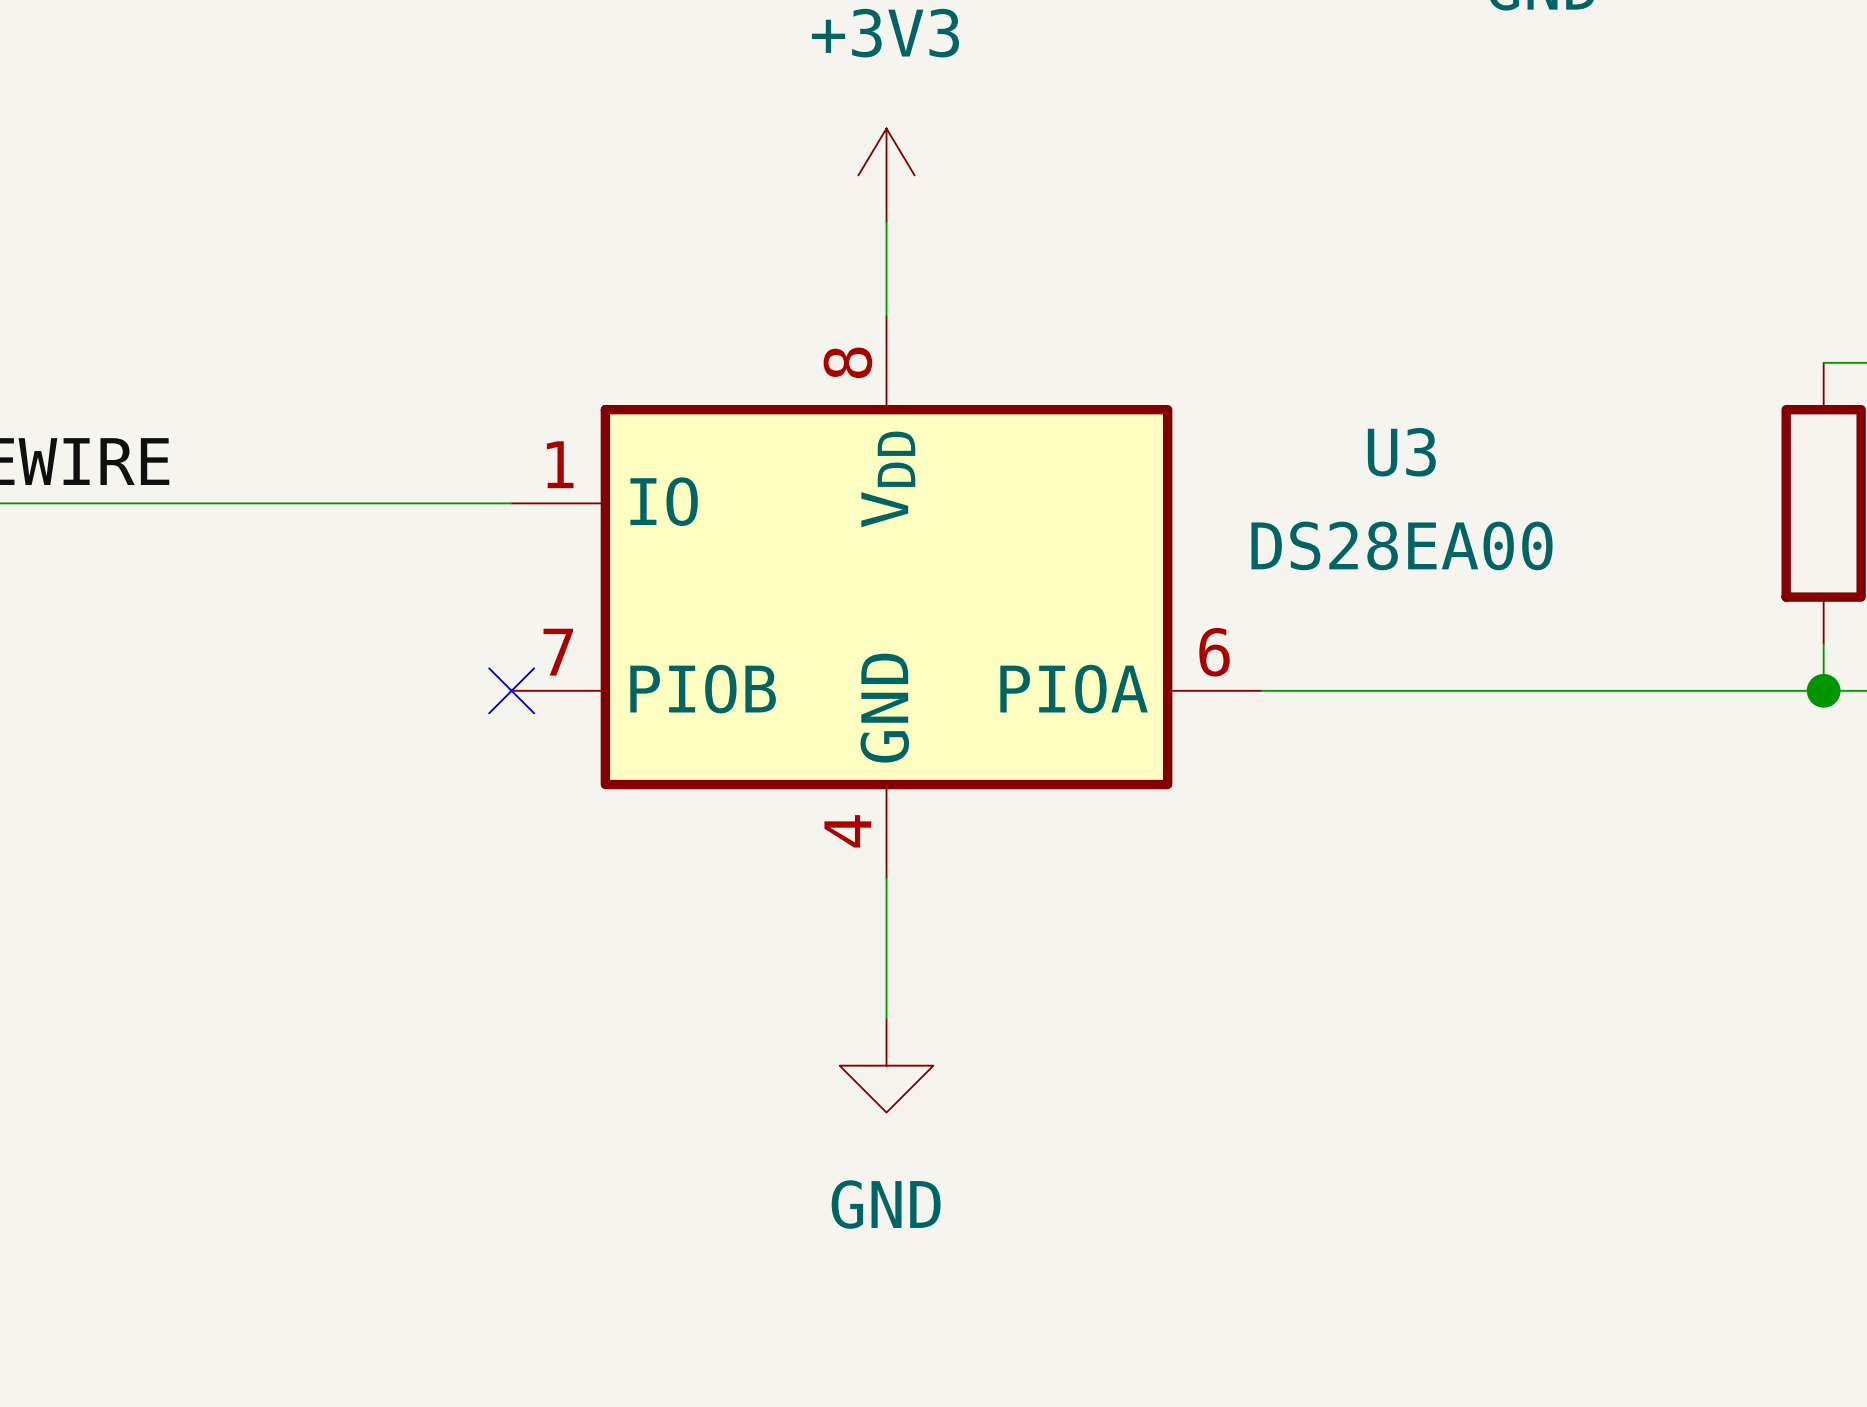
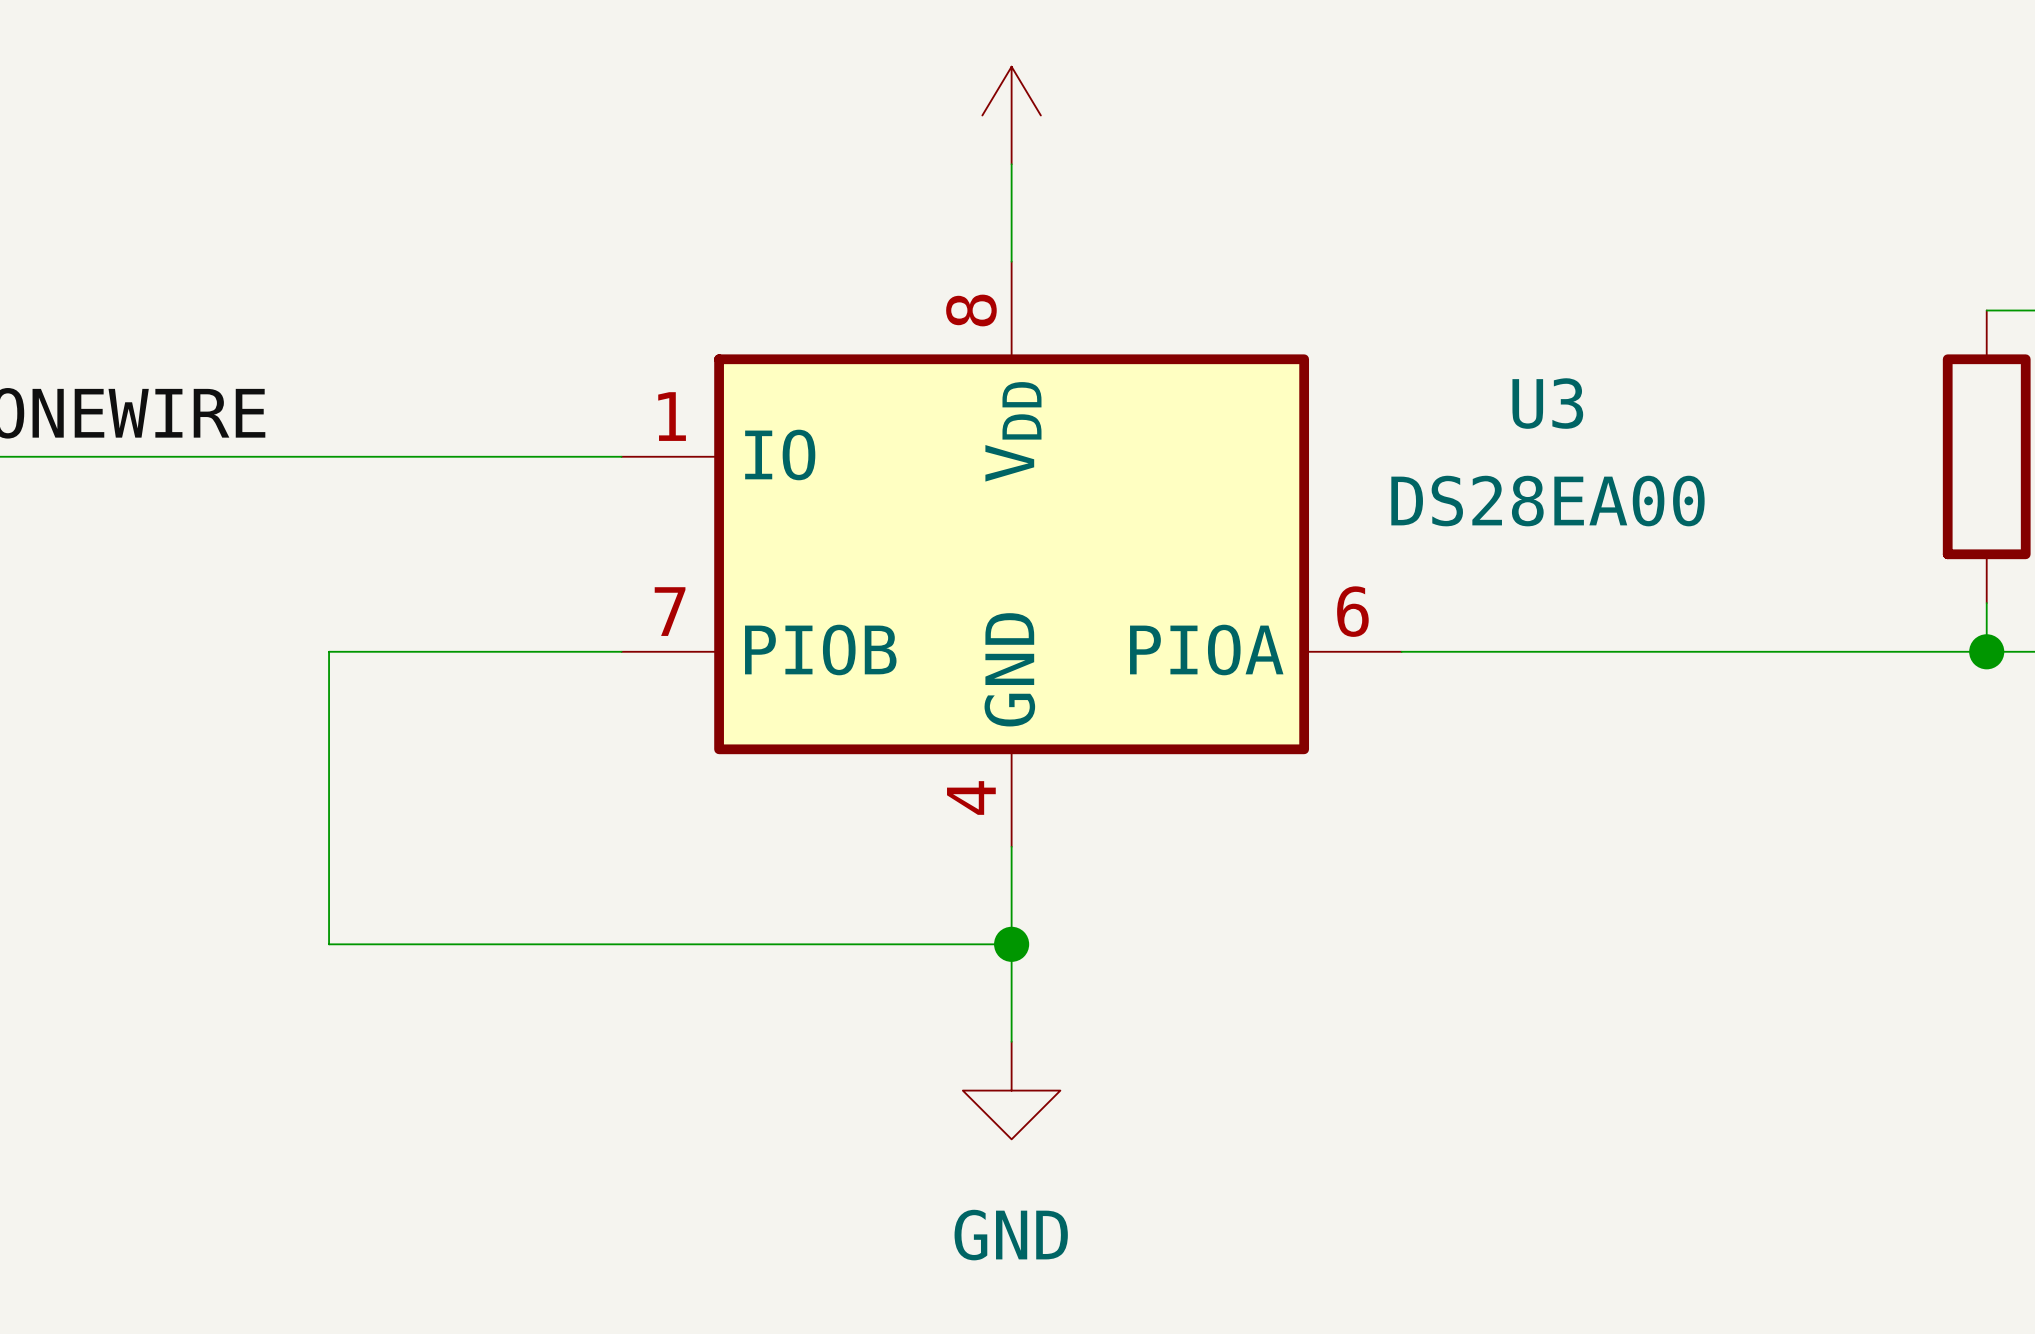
wire: none -> (621, 651) (329, 651) (329, 944) (1011, 944)
no-connect mark: (511, 690) -> none
junction: none -> (1011, 944)
power symbol position: GND (886, 1065) -> GND (1011, 1090)

